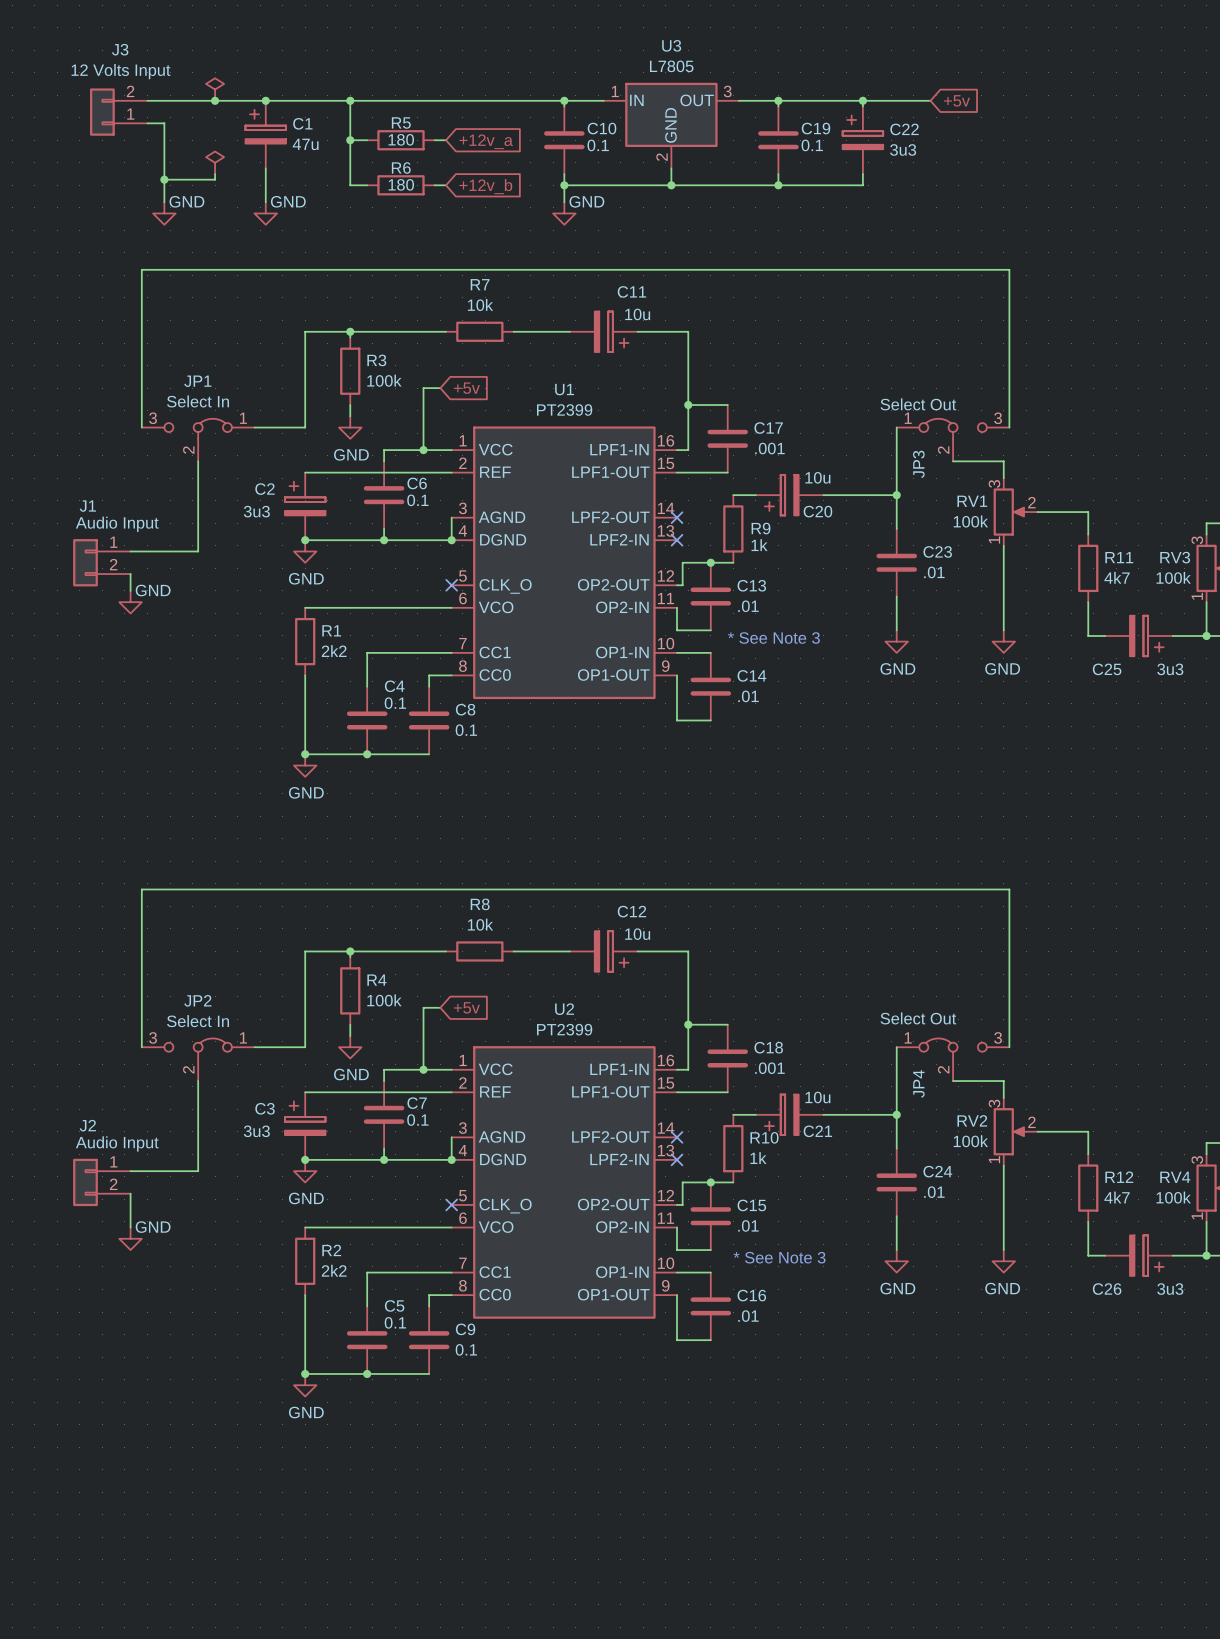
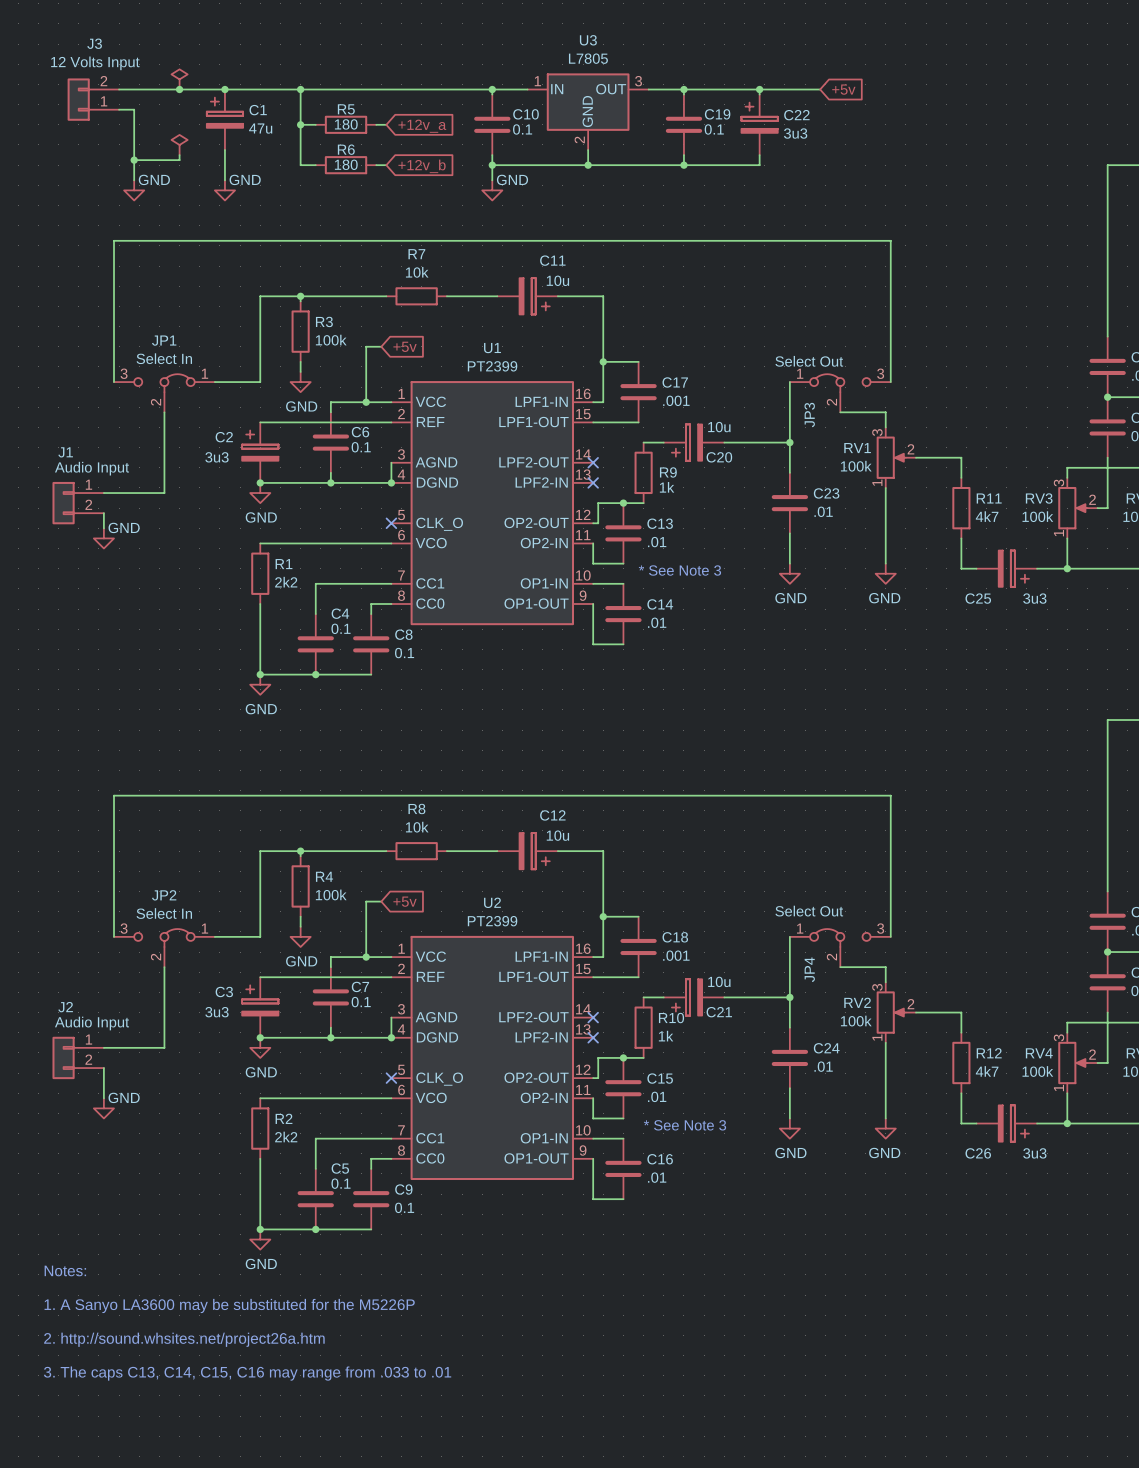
text: none -> Notes: (65, 1270)
text: none -> 1. A Sanyo LA3600 may be substituted for the M5226P (229, 1305)
text: none -> 2. http://sound.whsites.net/project26a.htm (184, 1339)
text: none -> 3. The caps C13, C14, C15, C16 may range from .033 to .01 (247, 1373)

